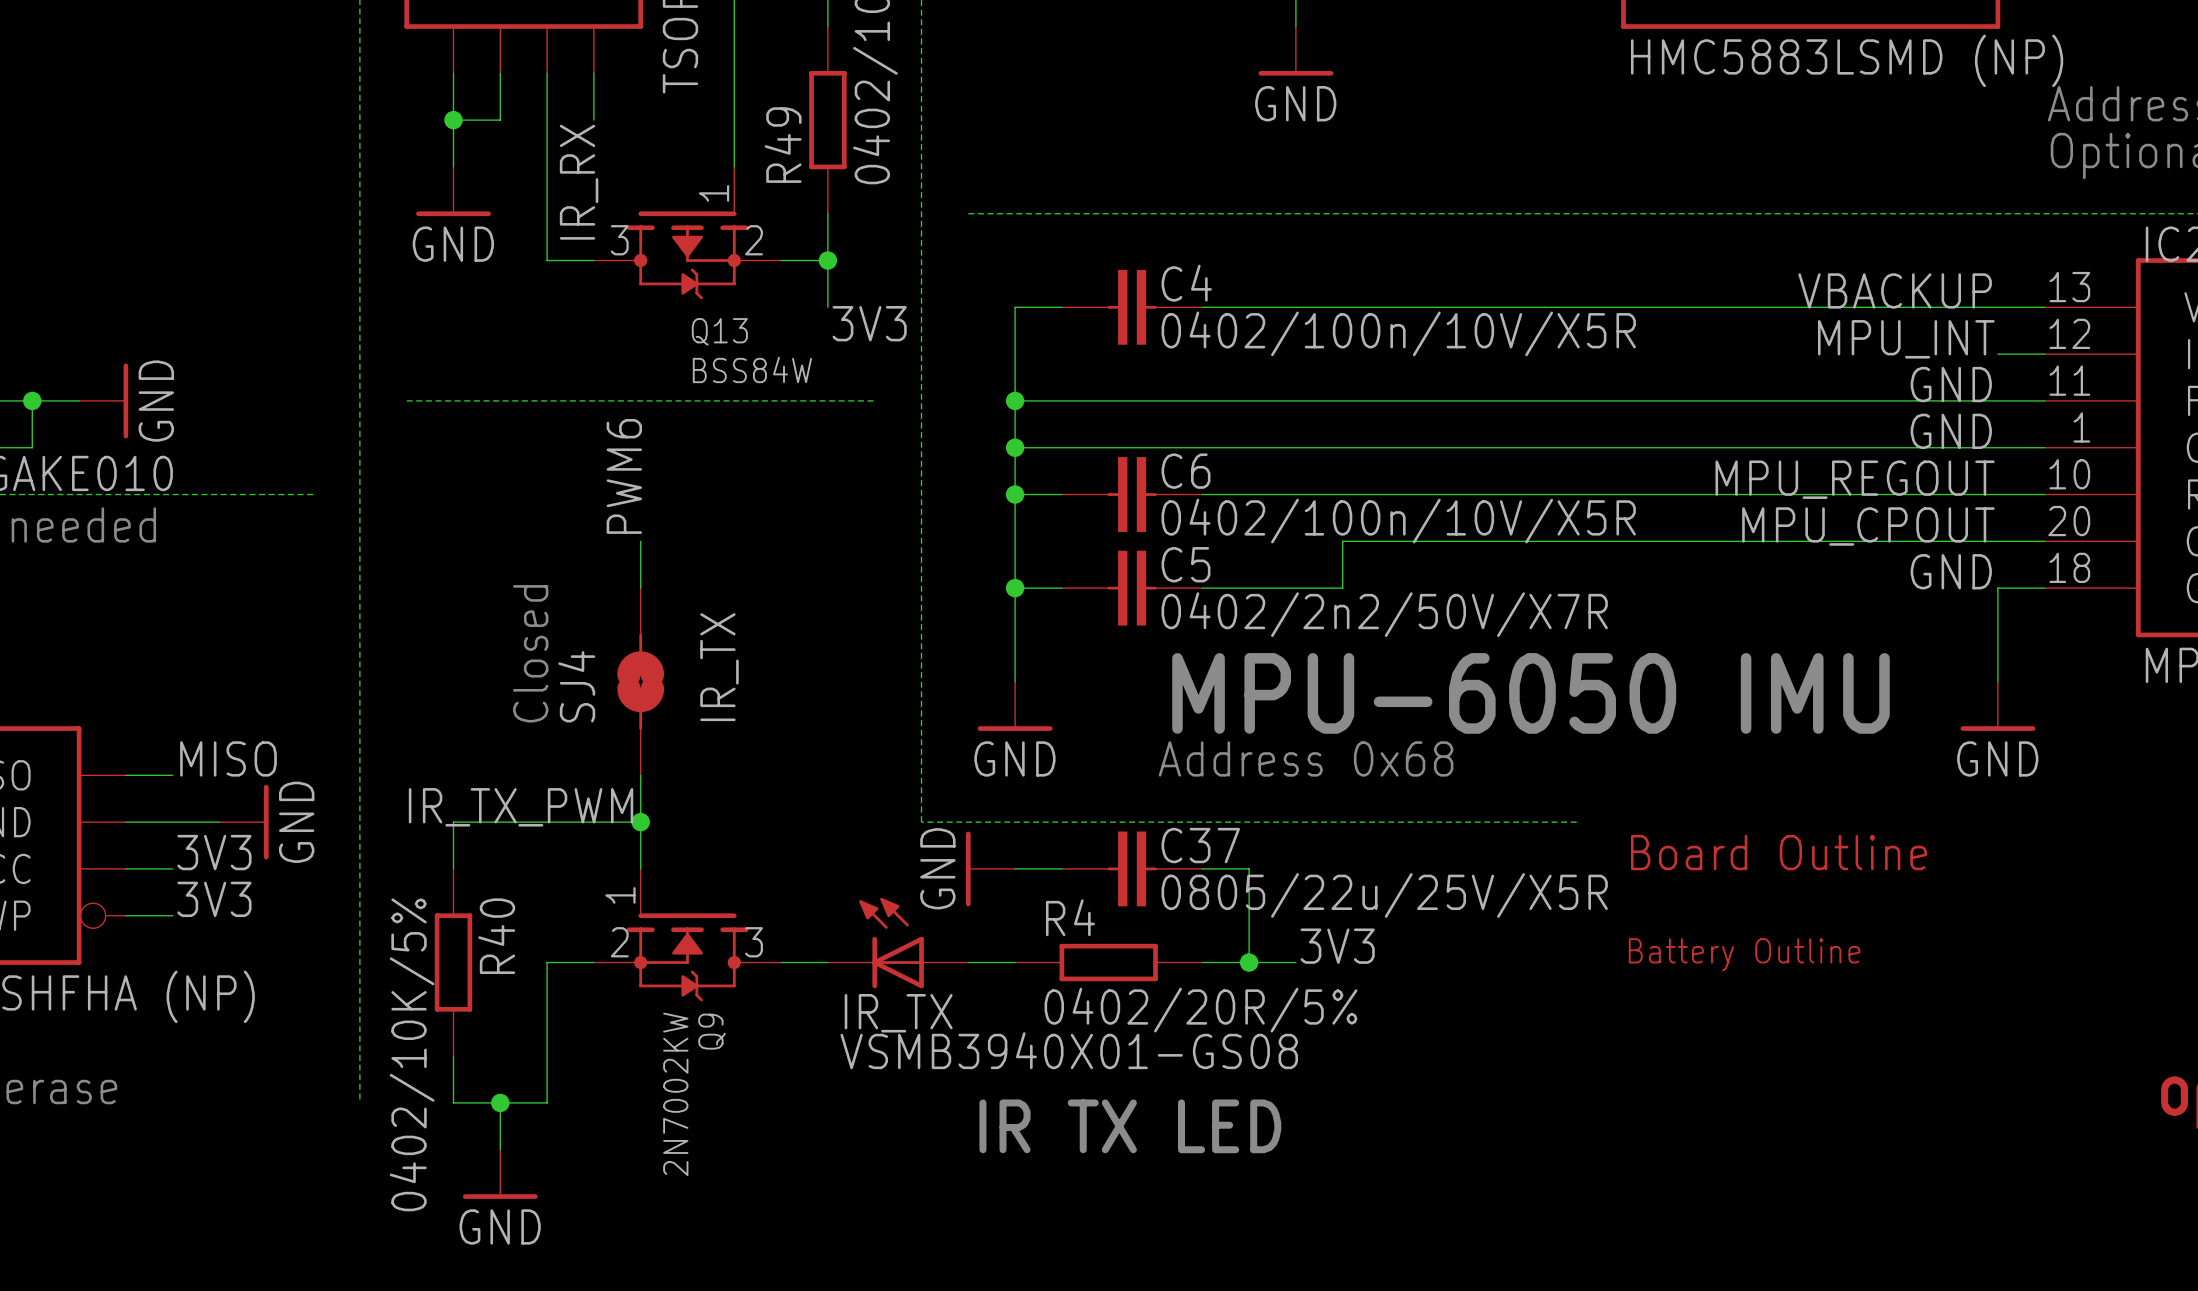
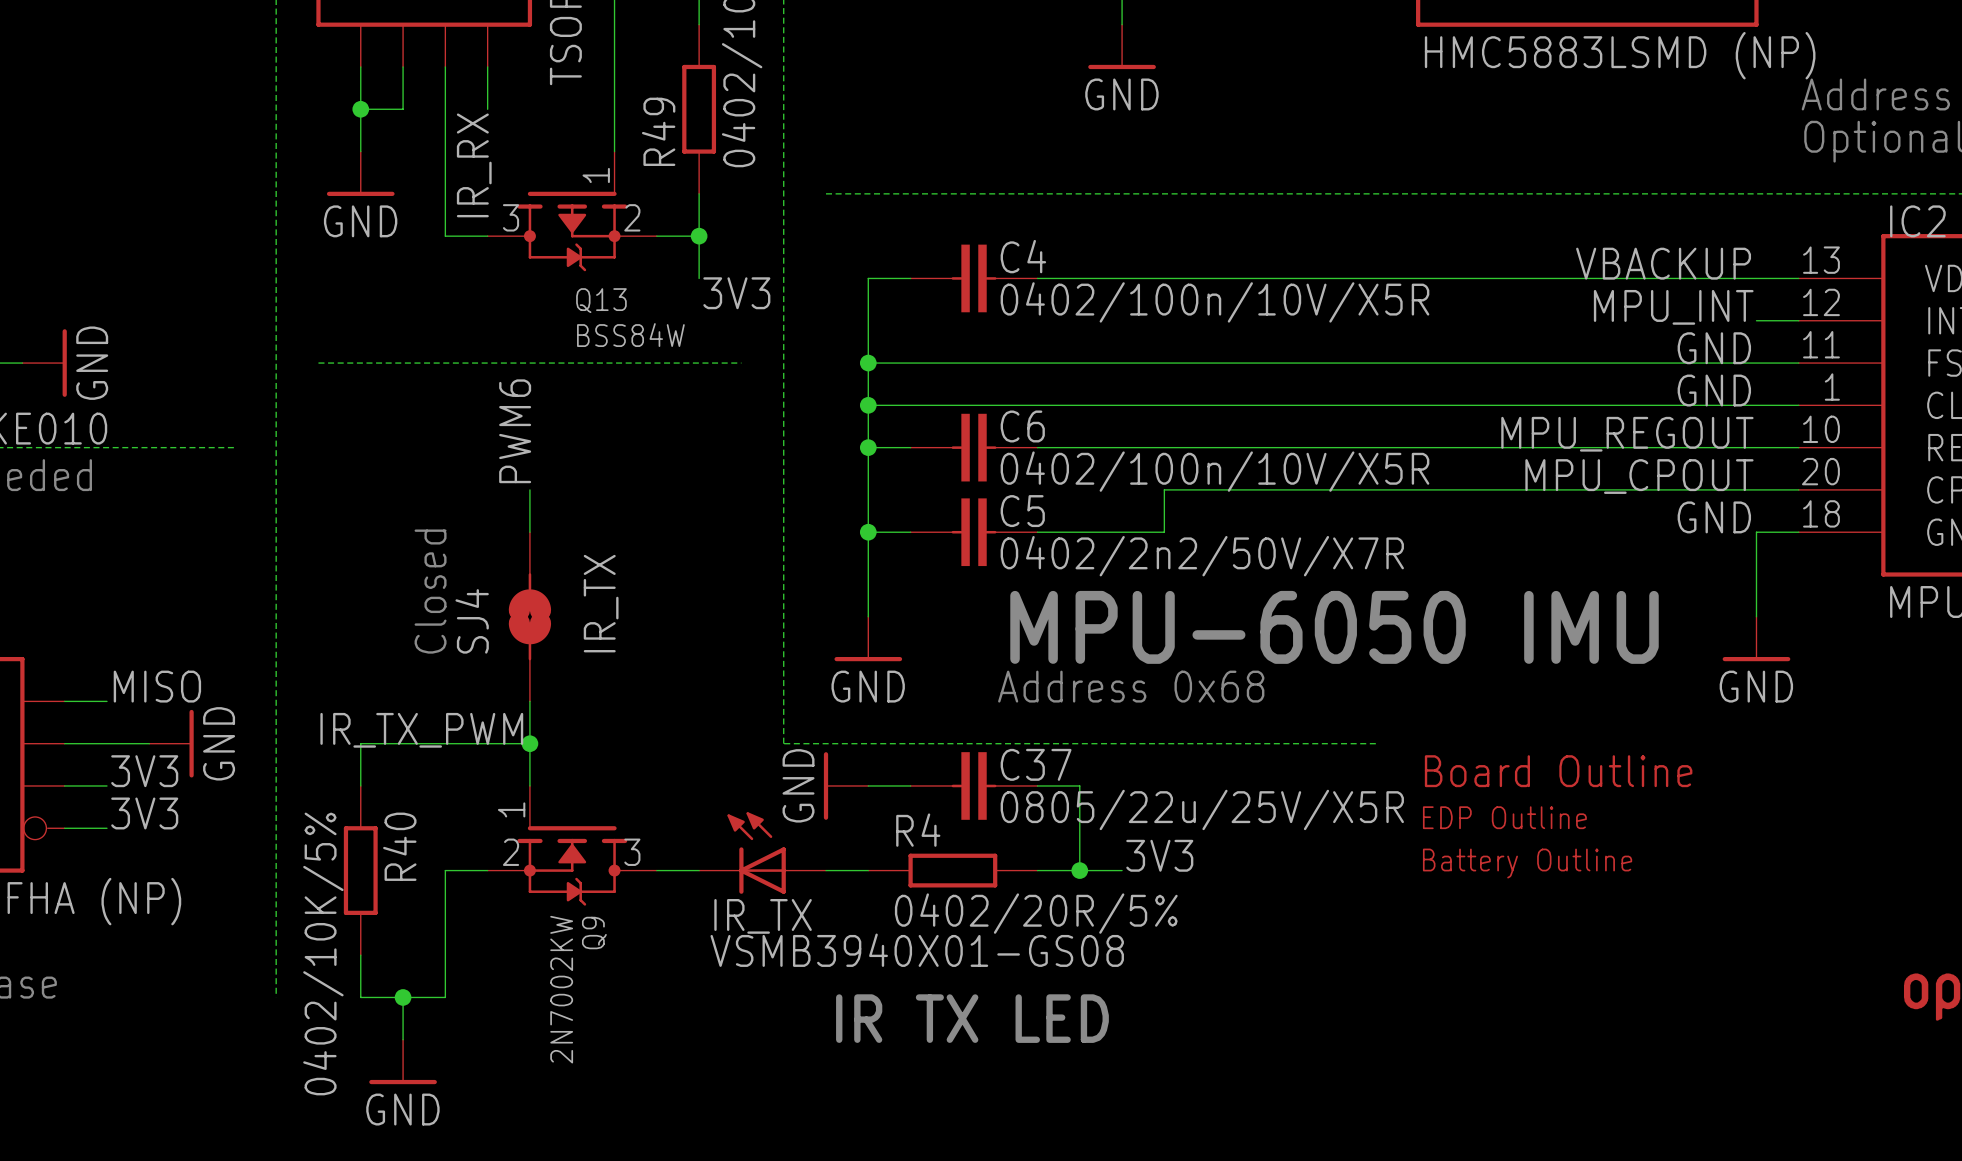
part: none -> (1504, 817)

